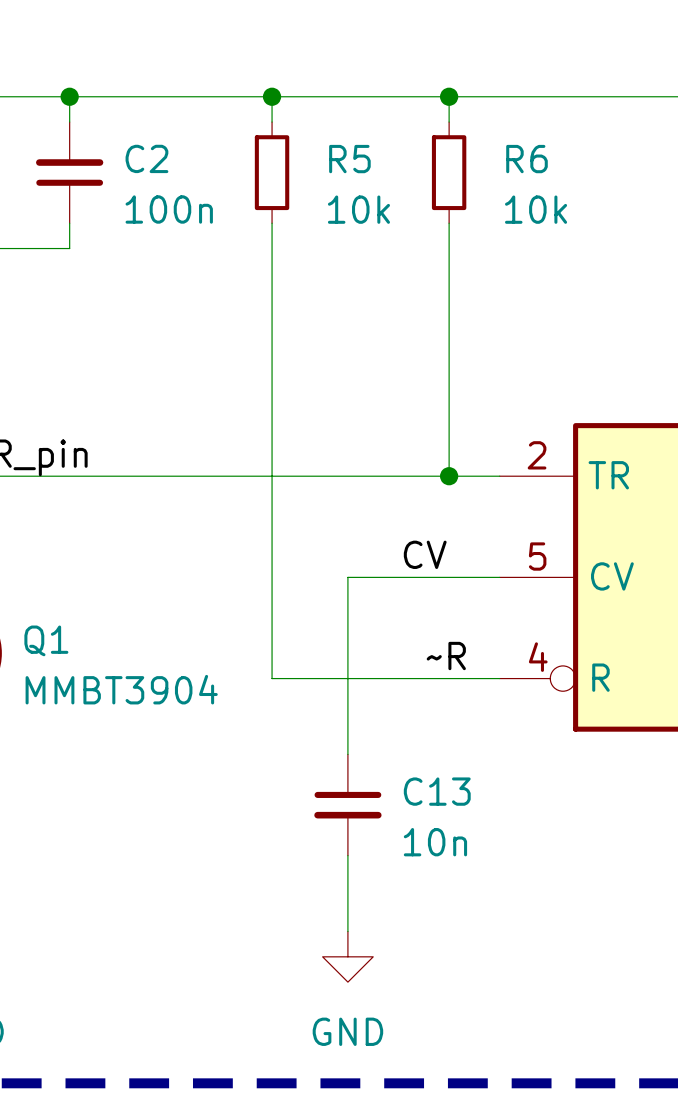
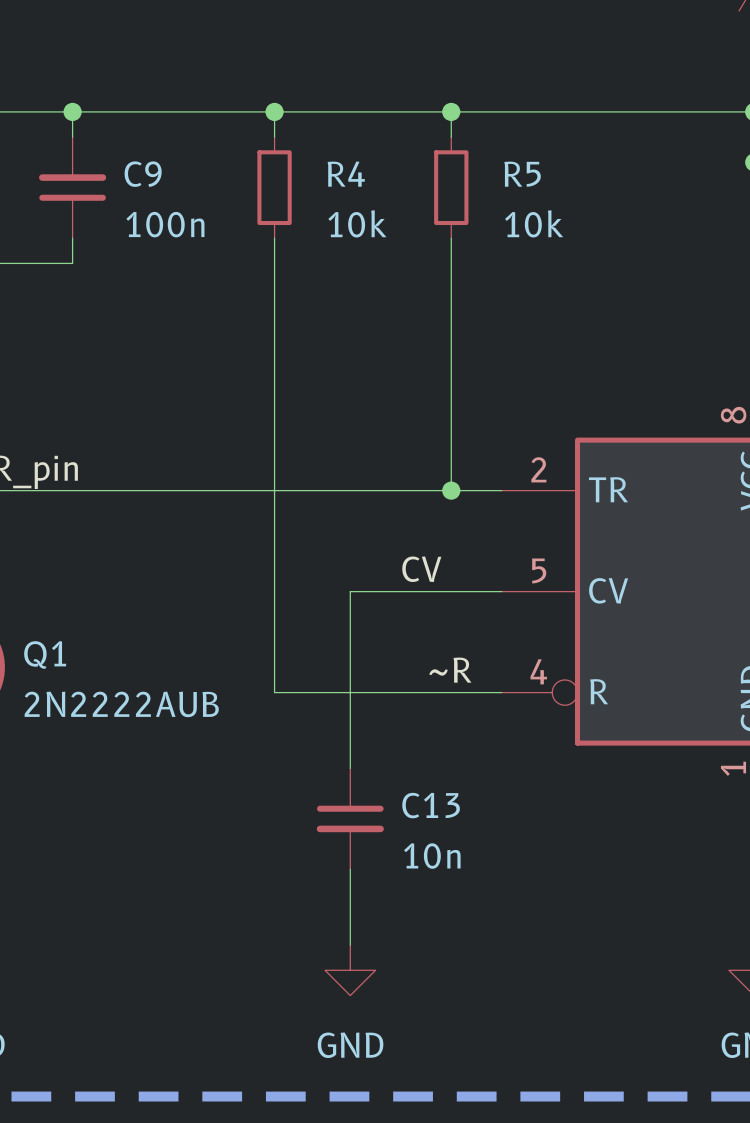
C2 name: C2 (146, 158) -> C9 (143, 174)
R5 name: R5 (349, 159) -> R4 (346, 174)
R6 name: R6 (527, 159) -> R5 (522, 174)
Q1 value: MMBT3904 (121, 689) -> 2N2222AUB (121, 704)

